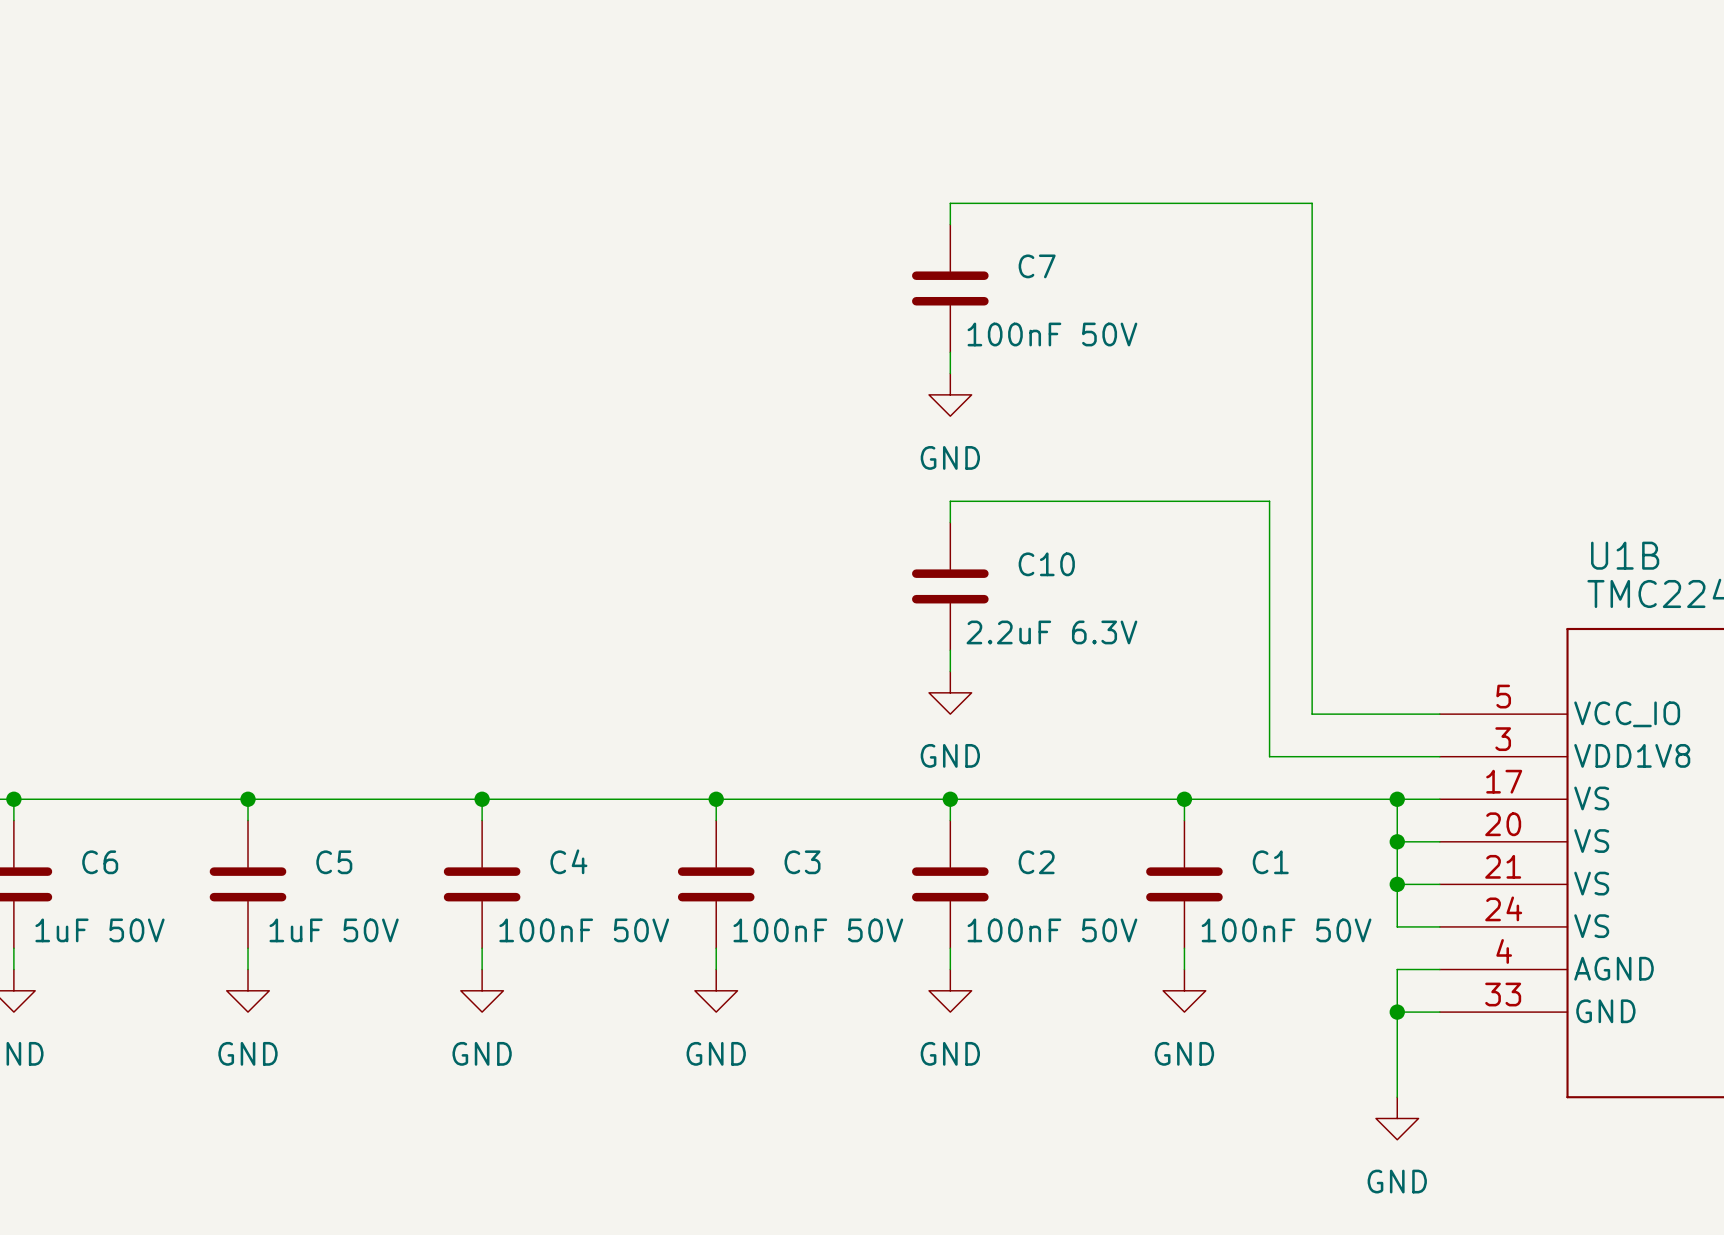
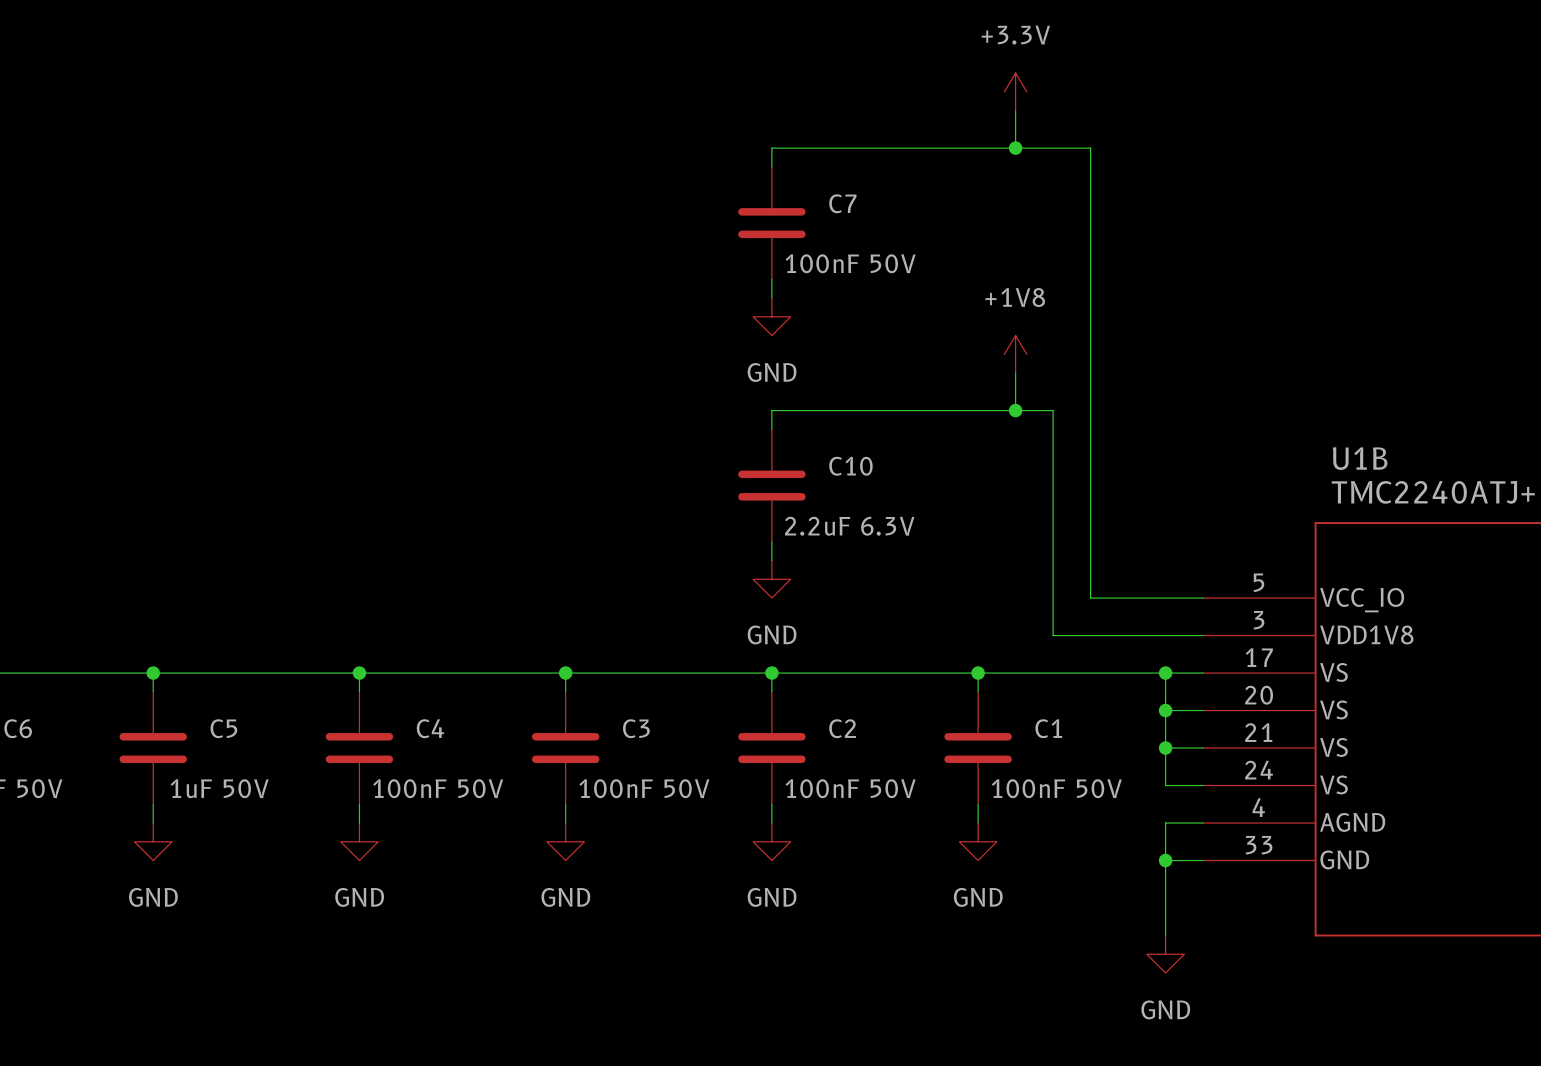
power symbol: none -> +3.3V (1015, 91)
wire: none -> (1015, 110) (1015, 148)
junction: none -> (1015, 148)
power symbol: none -> +1V8 (1015, 354)
wire: none -> (1015, 373) (1015, 410)
junction: none -> (1015, 410)

